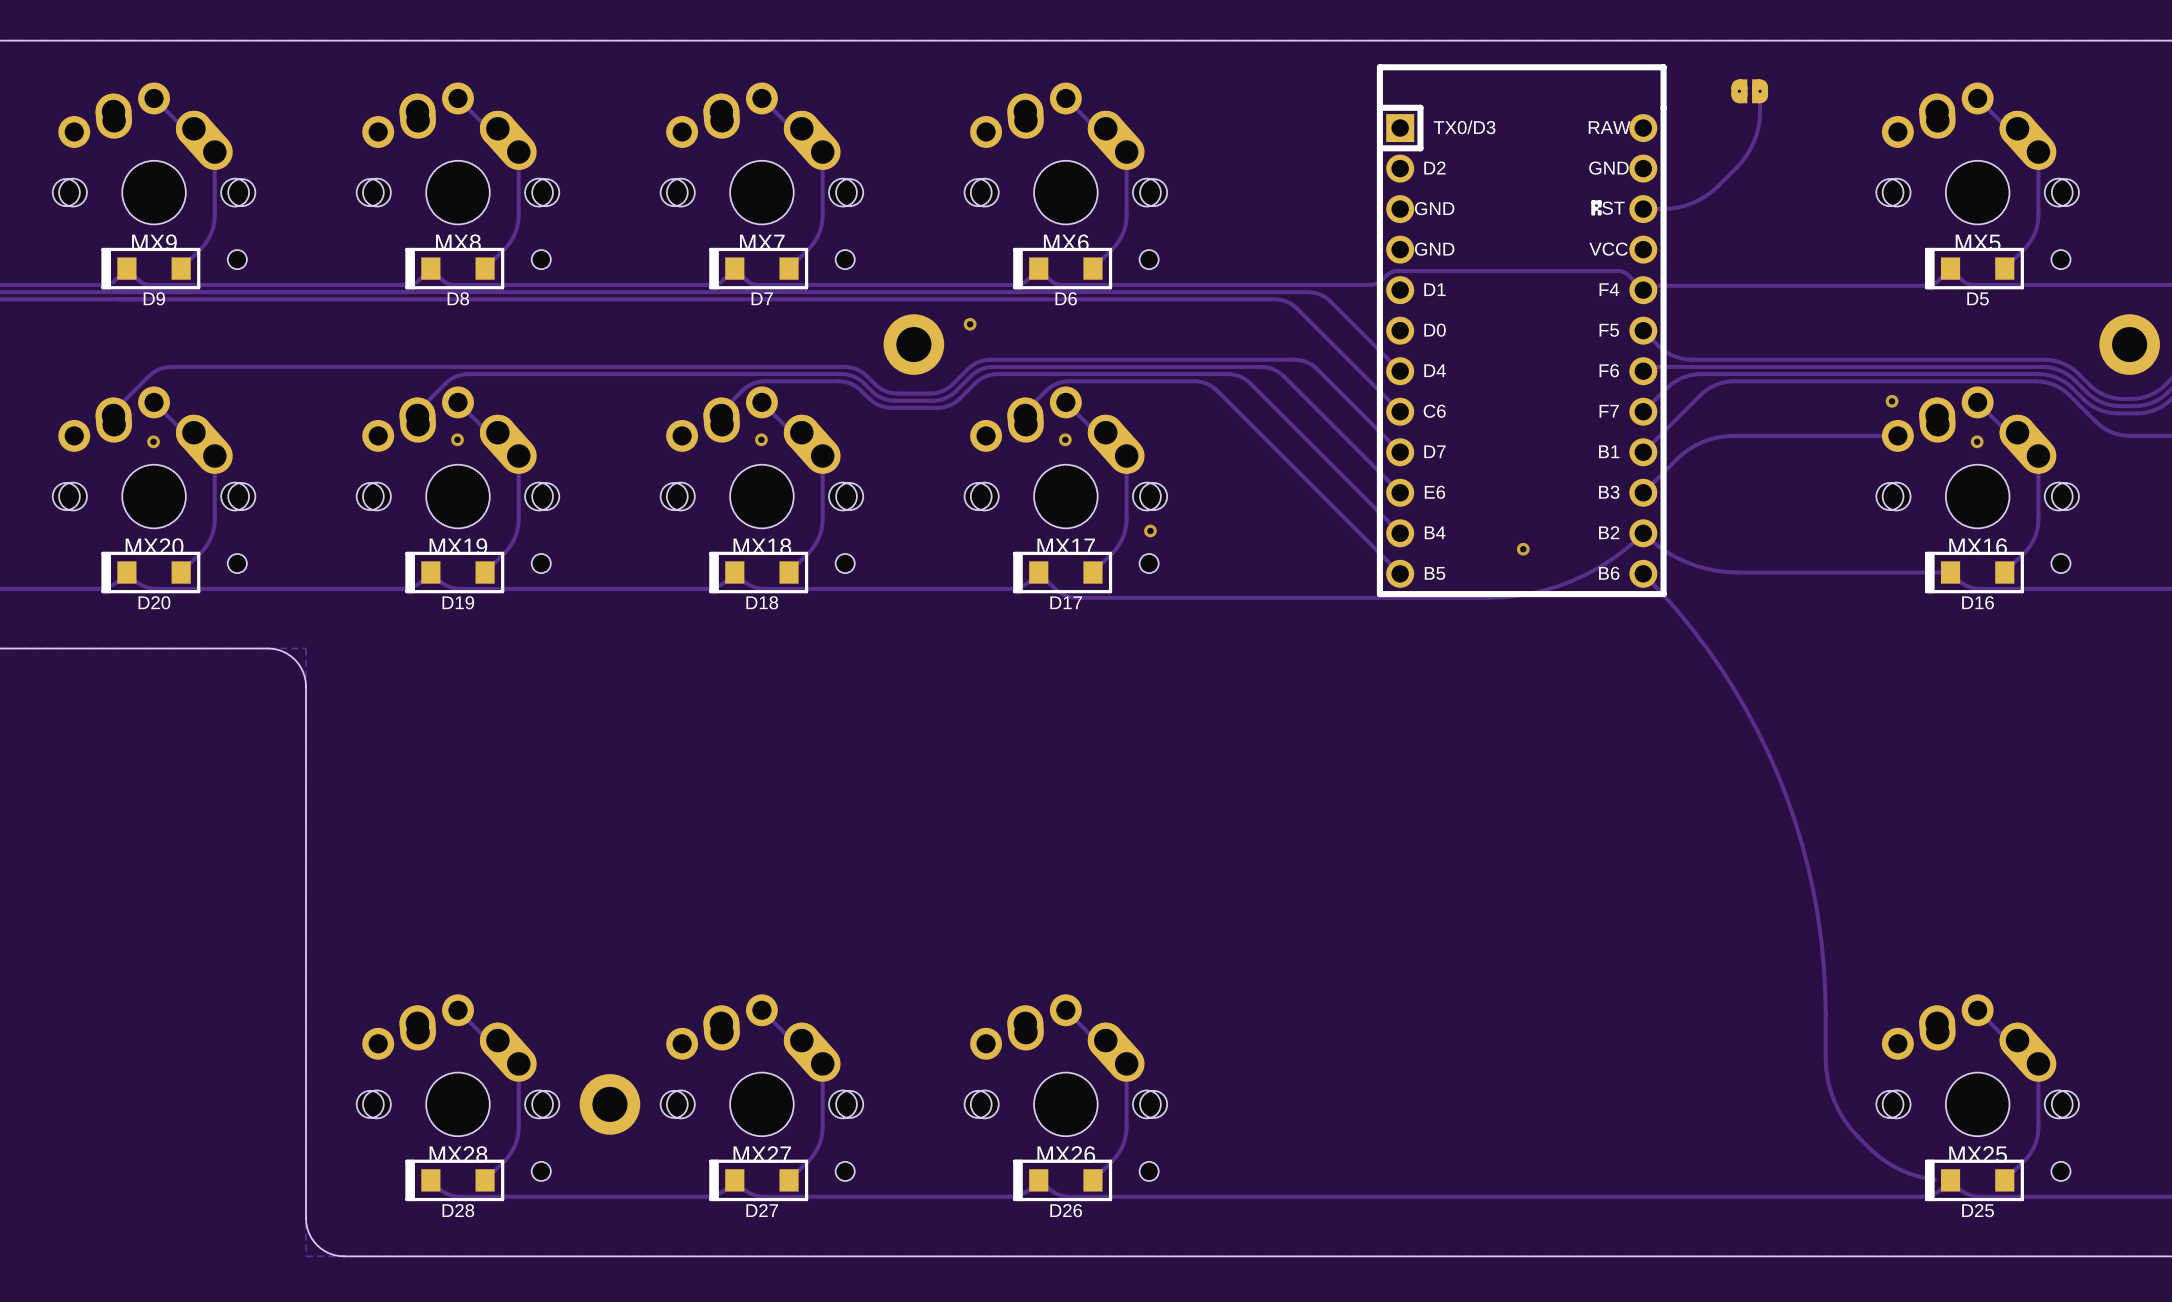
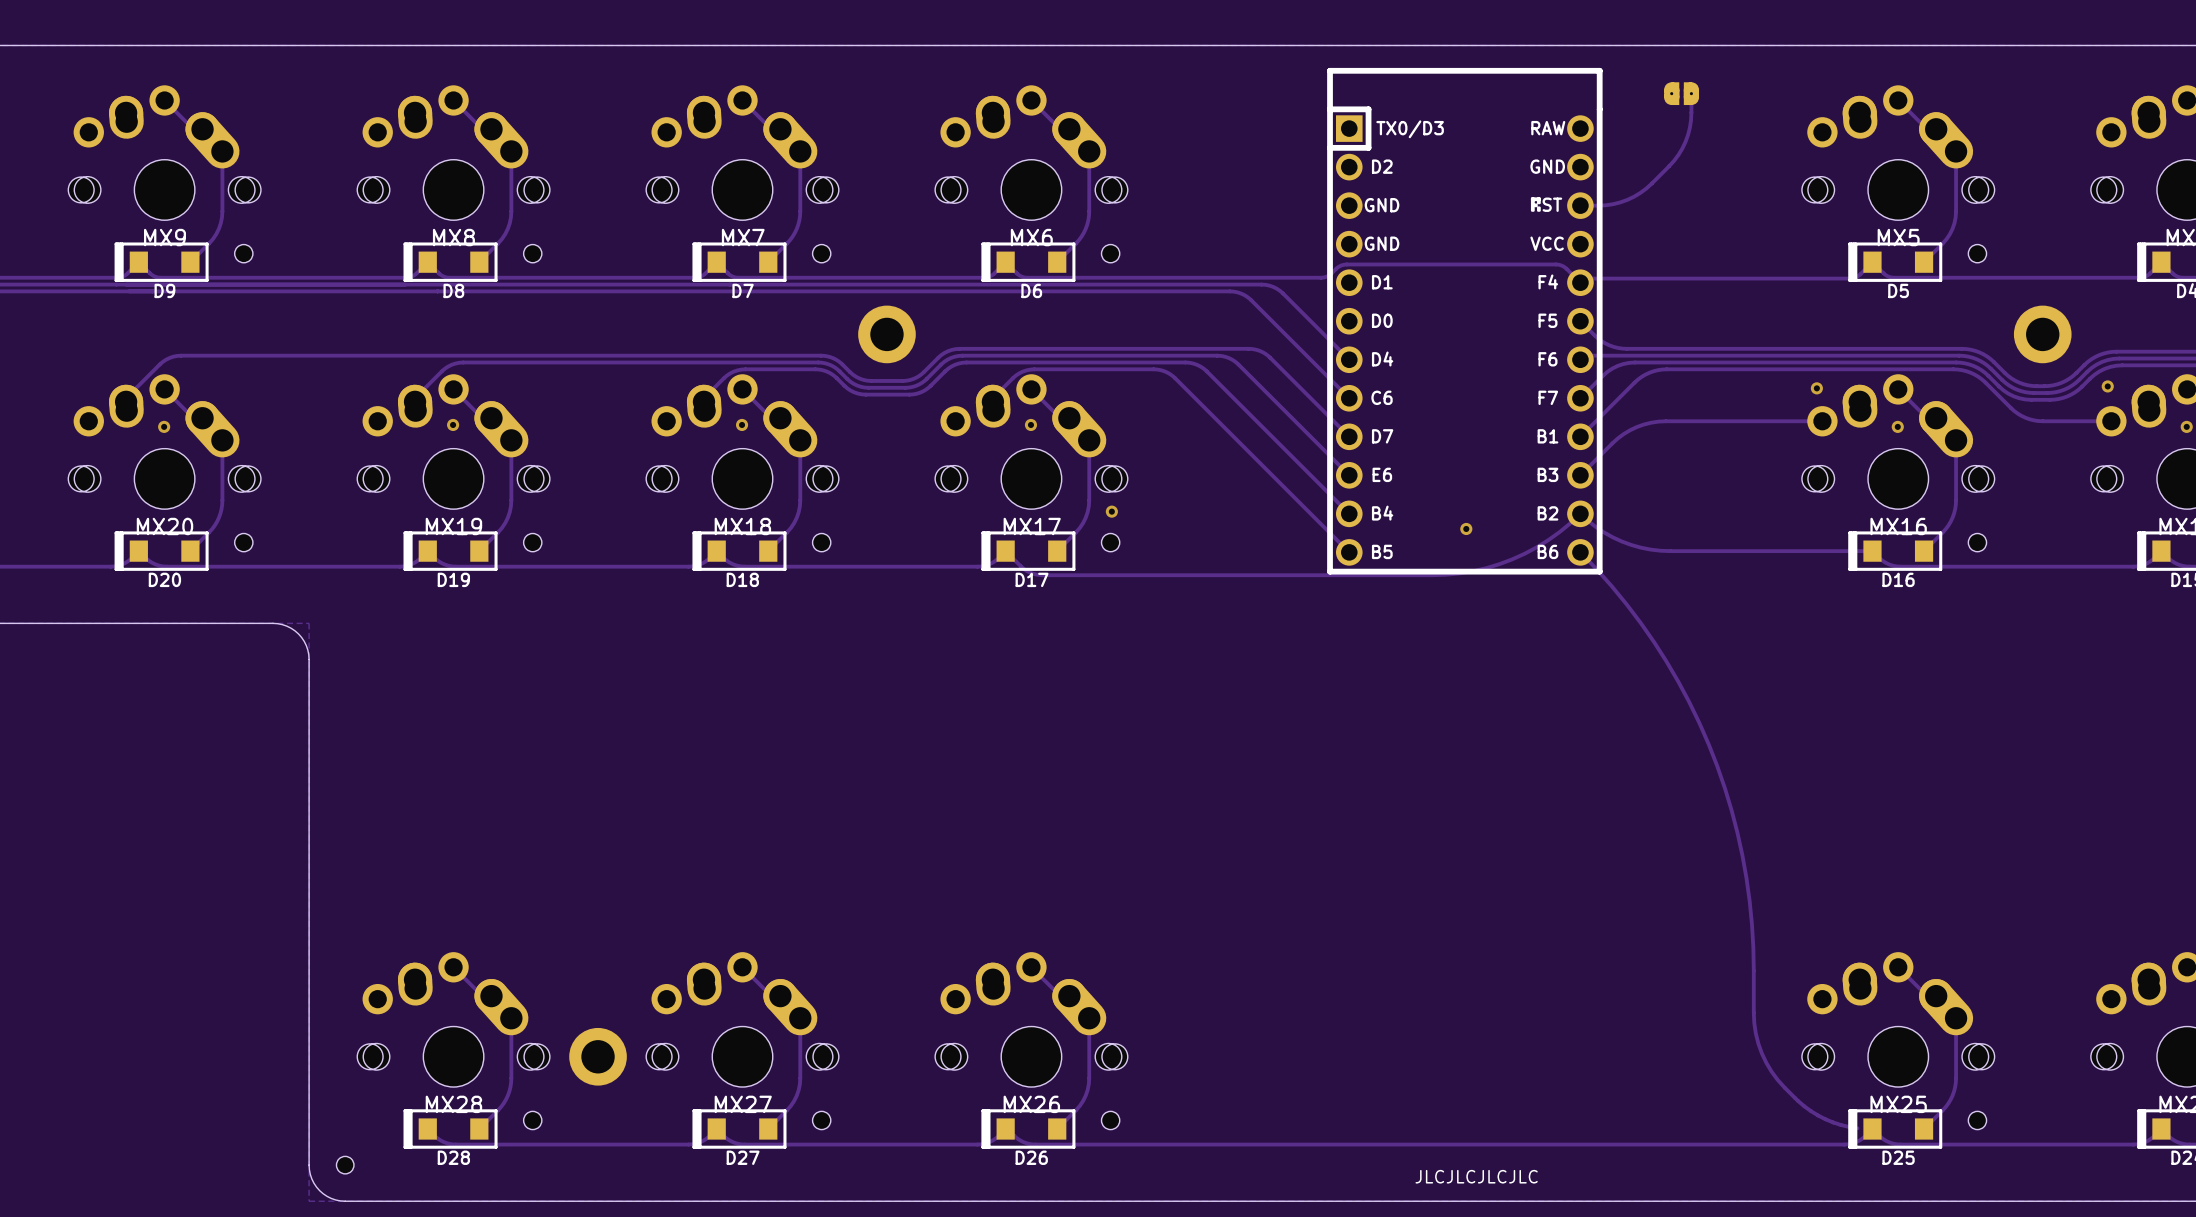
via: (970, 324) -> none
part: none -> (345, 1165)
text: none -> JLCJLCJLCJLC (1476, 1176)

